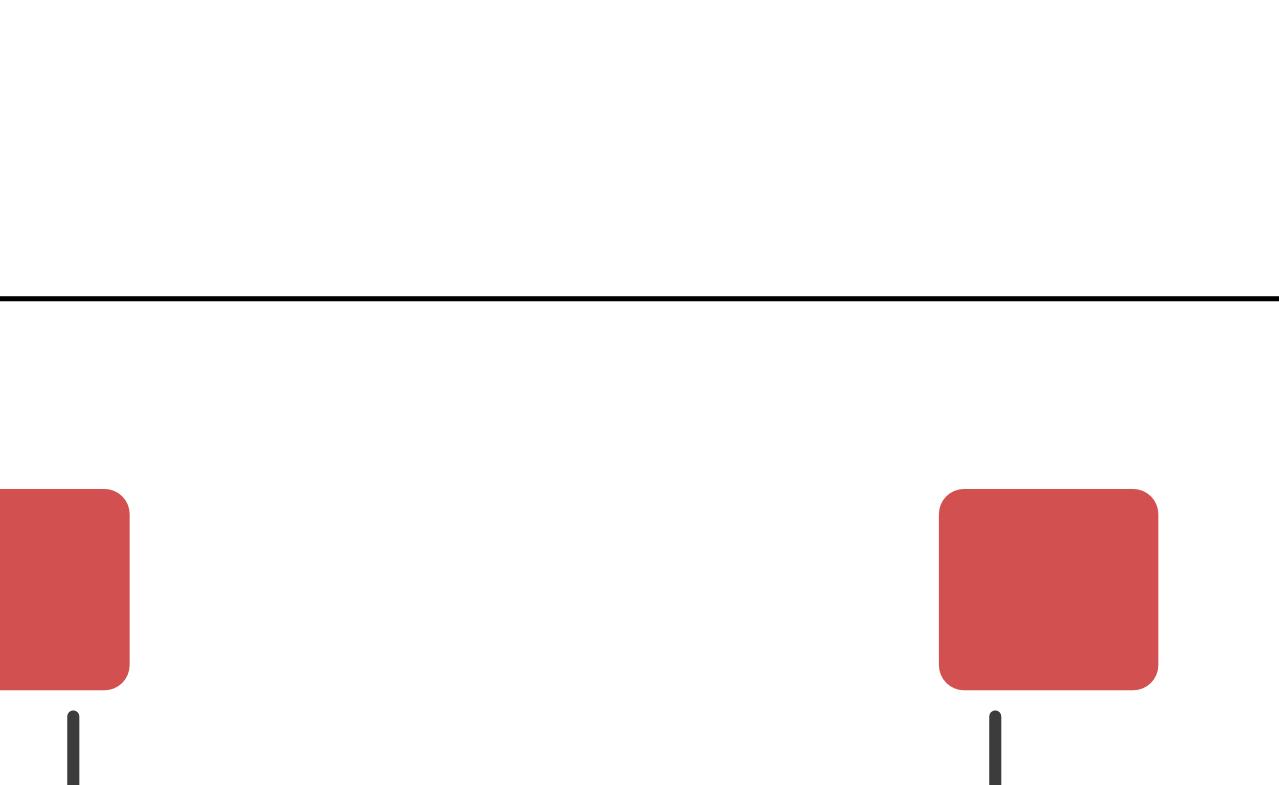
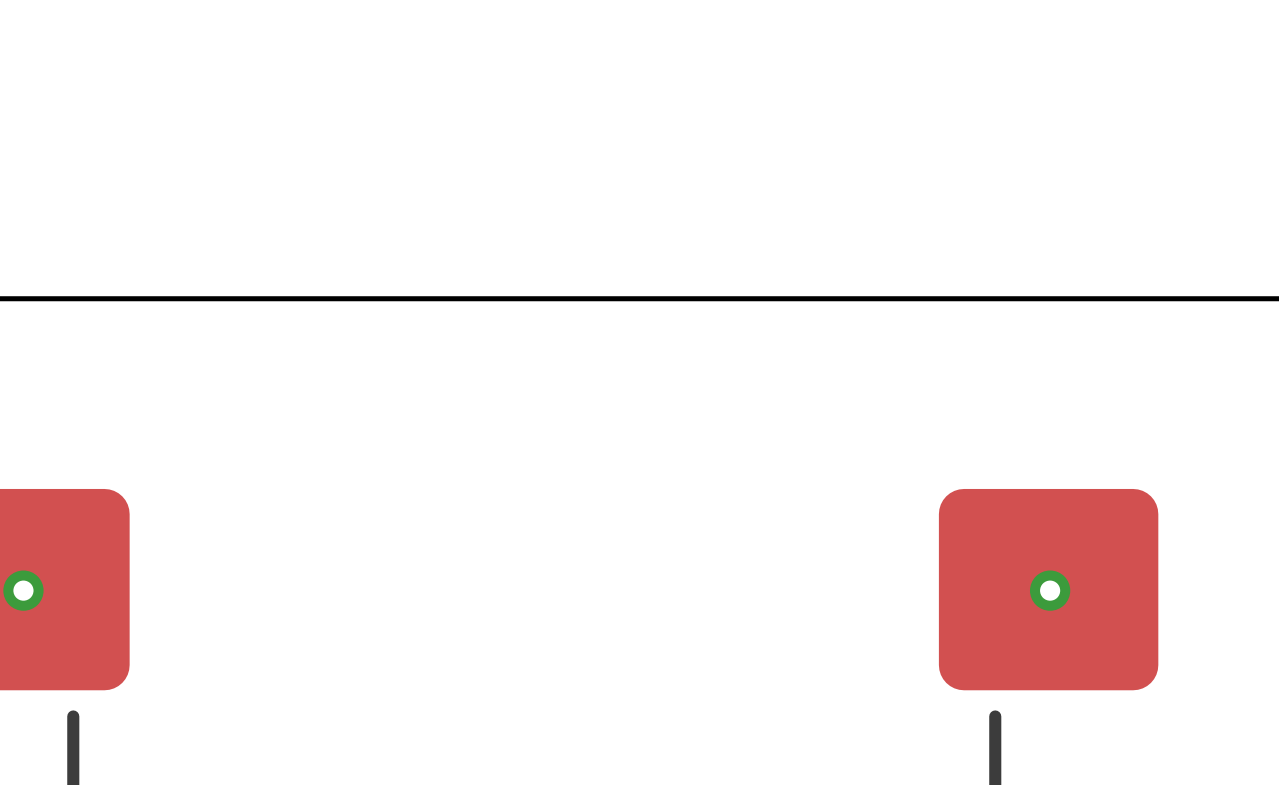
via: none -> (23, 590)
via: none -> (1050, 590)

